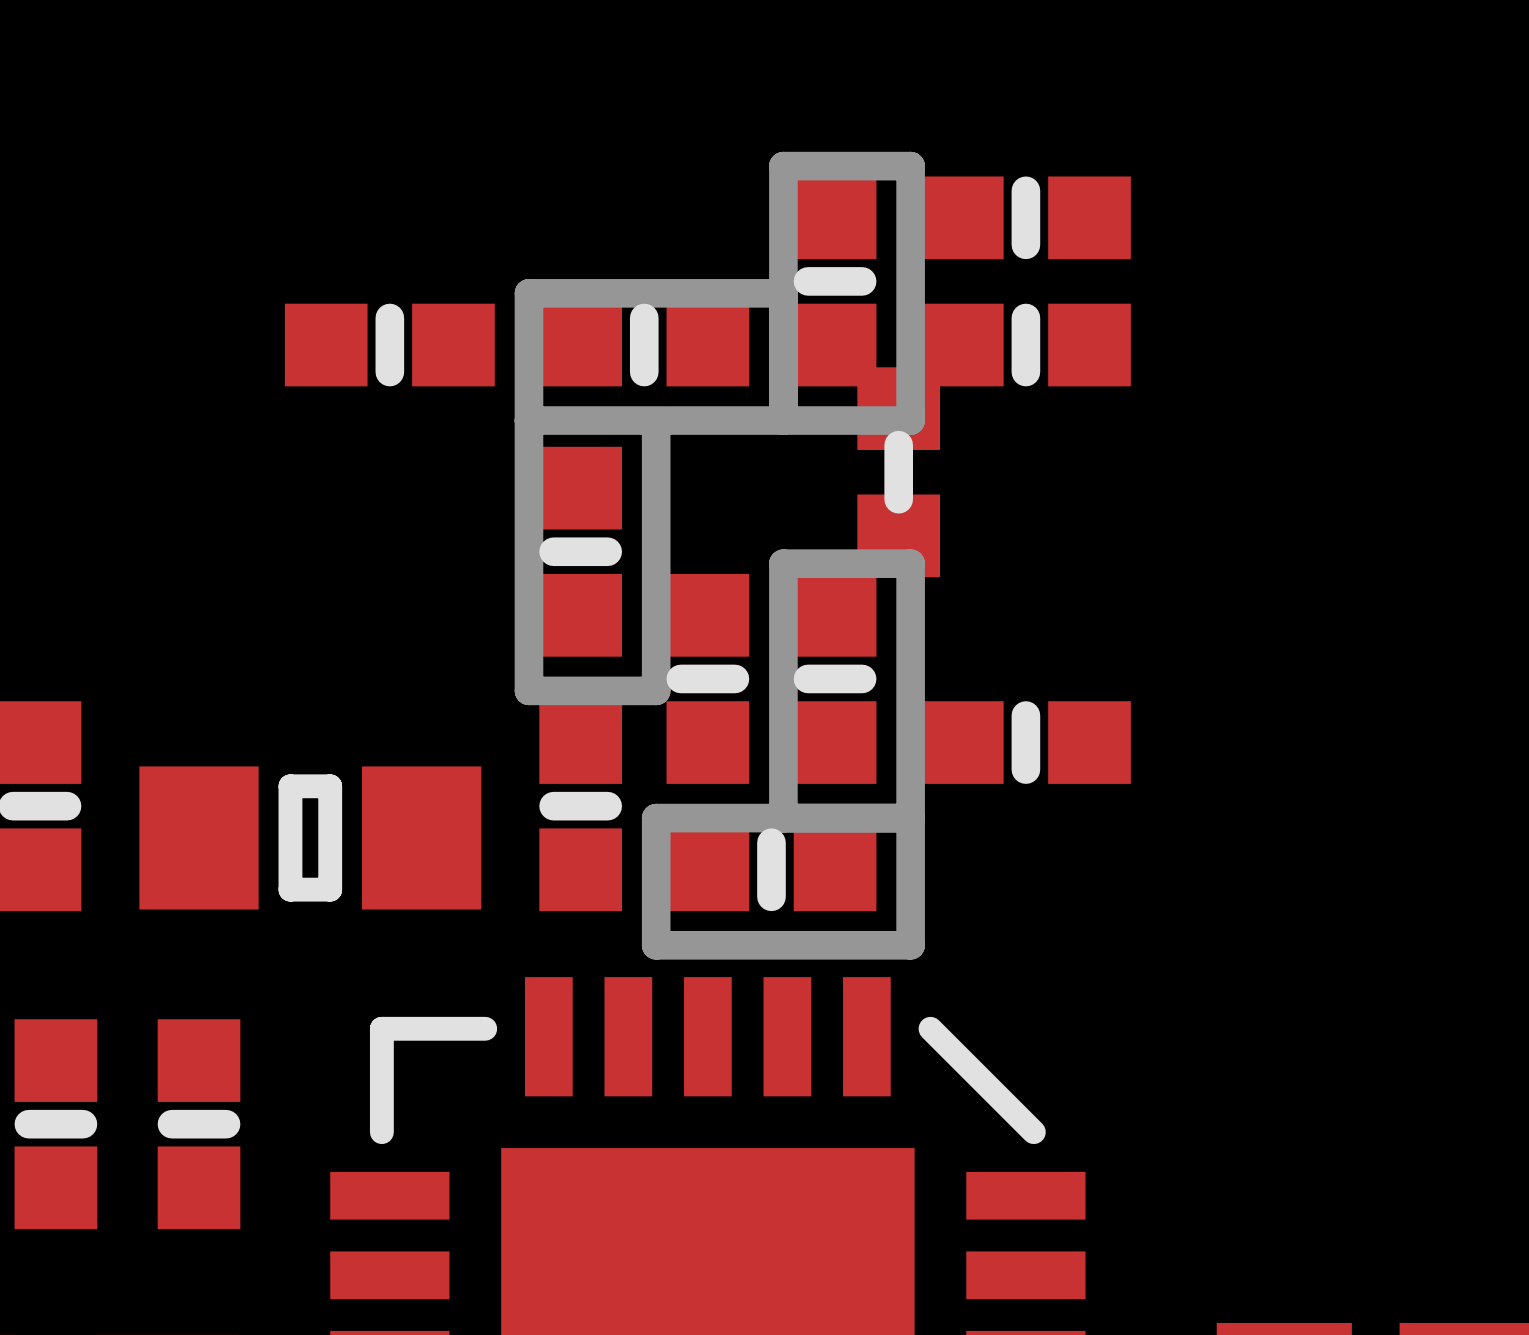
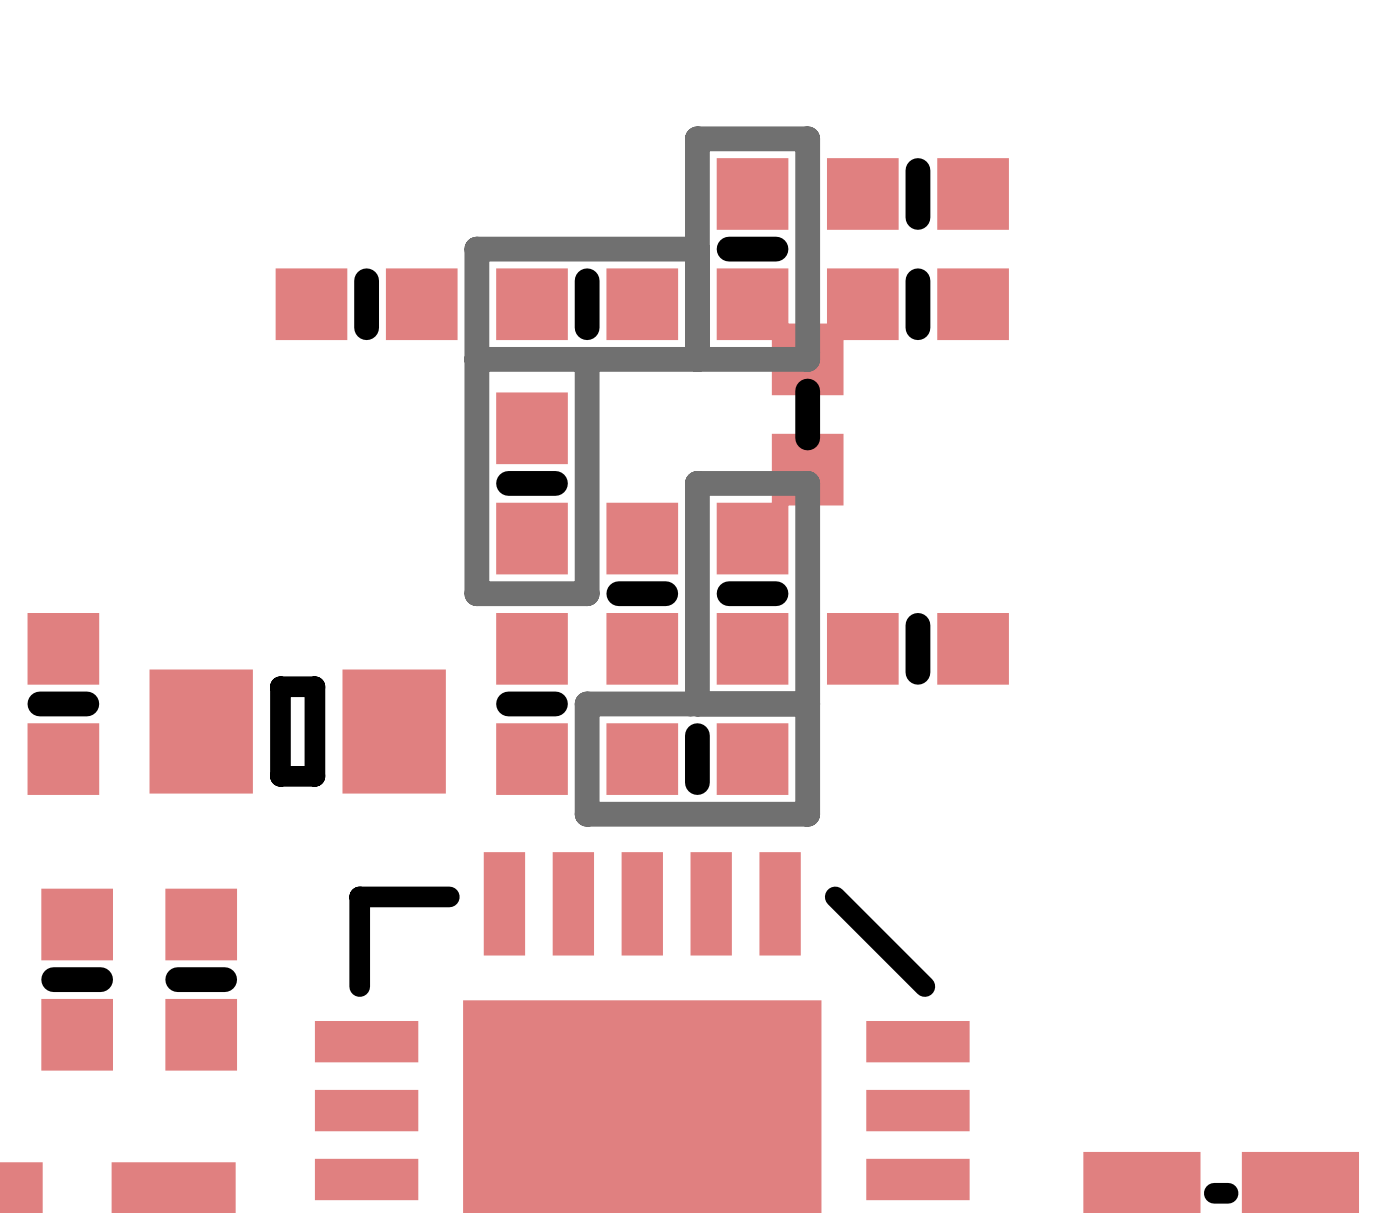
line: (783, 293) (528, 293) (528, 690) (656, 690) (656, 428) -> (697, 249) (476, 249) (476, 593) (587, 593) (587, 366)
line: (528, 420) (910, 420) (910, 166) (783, 166) (783, 420) -> (476, 359) (807, 359) (807, 138) (697, 138) (697, 359)
line: (783, 818) (783, 563) (910, 563) (910, 945) (656, 945) (656, 818) (910, 818) -> (697, 703) (697, 483) (807, 483) (807, 814) (587, 814) (587, 703) (807, 703)

